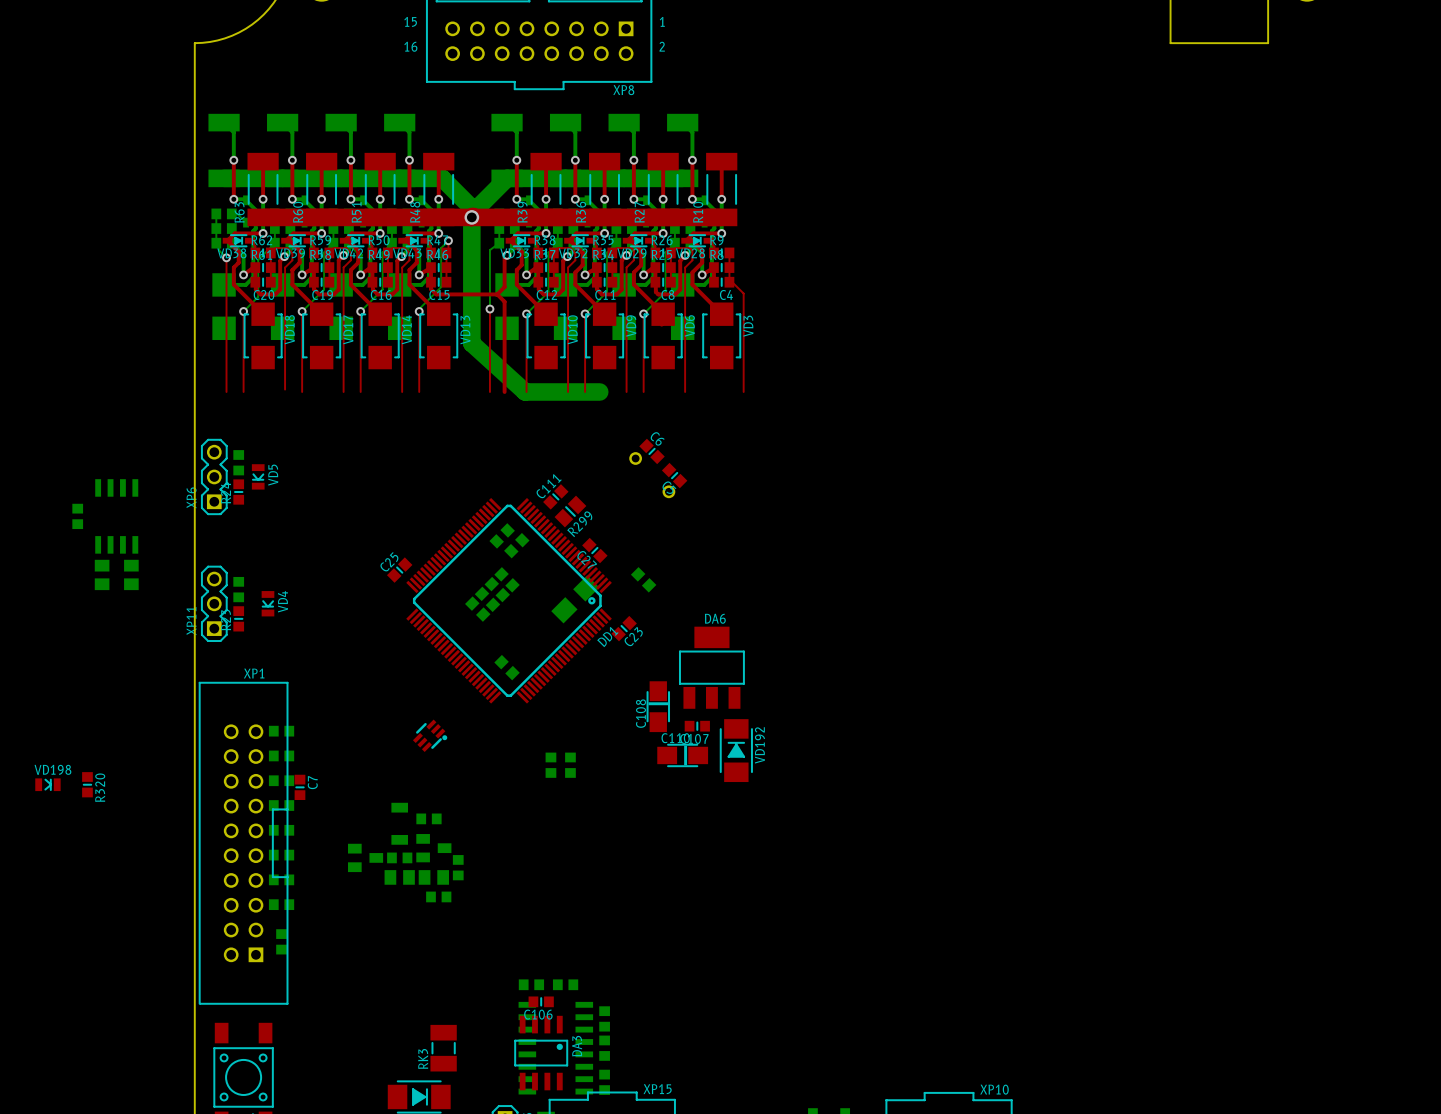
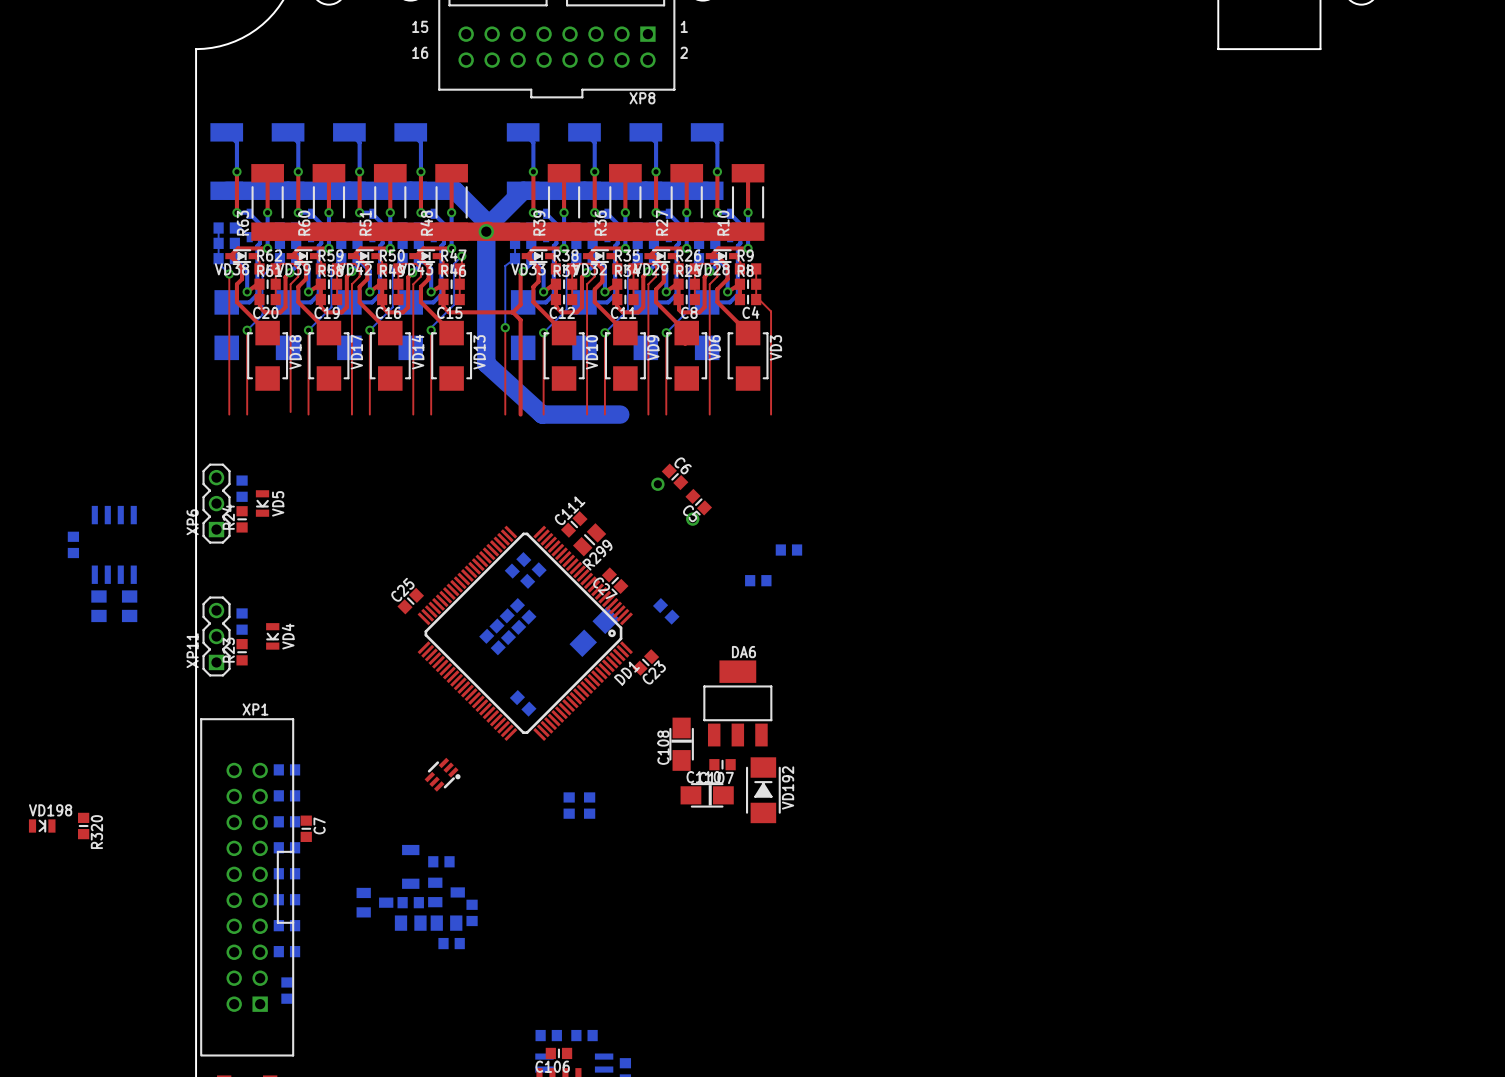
part: none -> (788, 550)
part: none -> (758, 580)

